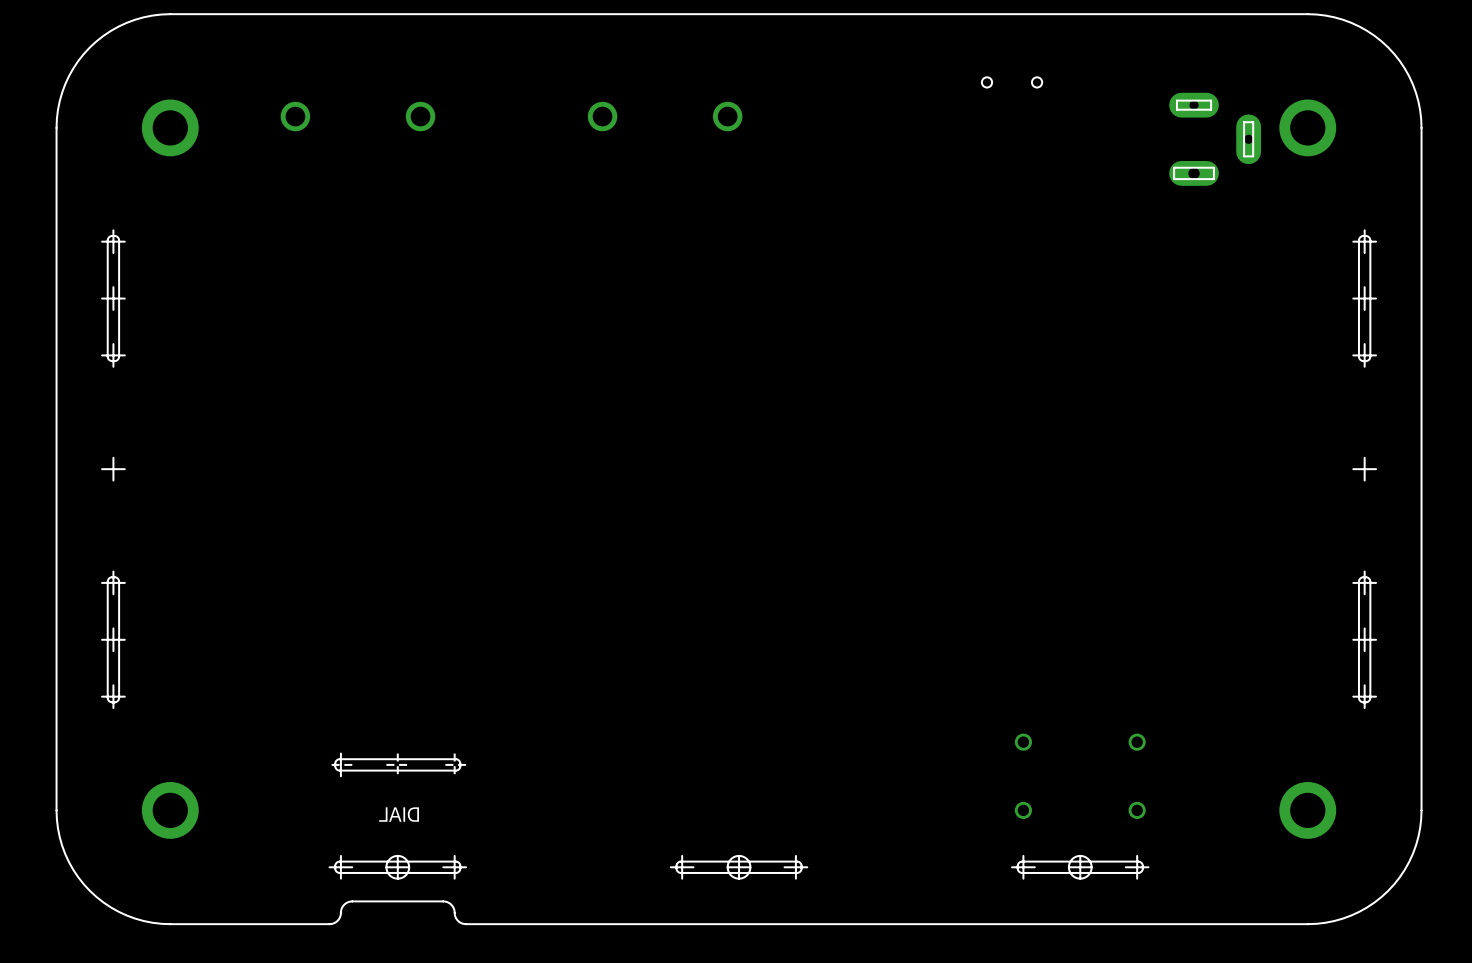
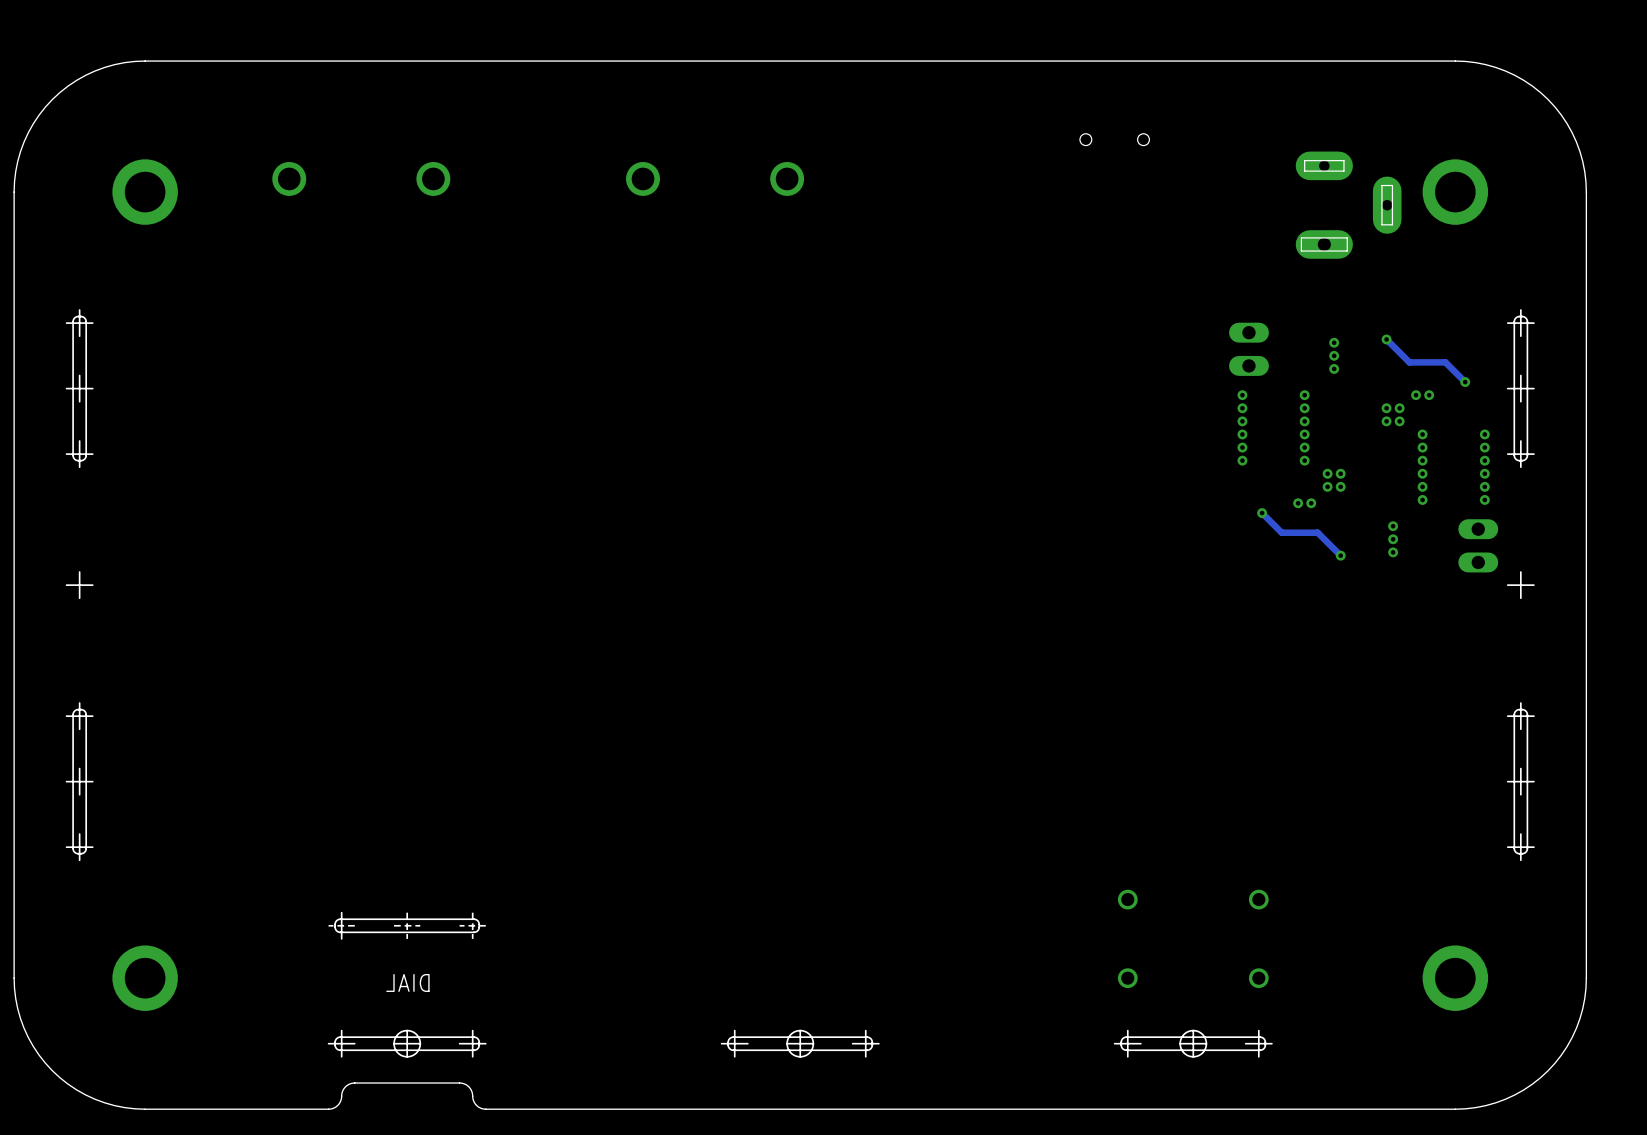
track: none -> (1386, 339) (1409, 362) (1445, 362) (1465, 382)
via: none -> (1386, 339)
via: none -> (1334, 342)
part: none -> (1248, 349)
via: none -> (1334, 355)
via: none -> (1334, 368)
via: none -> (1465, 382)
via: none -> (1242, 395)
via: none -> (1304, 395)
via: none -> (1416, 395)
via: none -> (1429, 395)
via: none -> (1242, 408)
via: none -> (1304, 408)
via: none -> (1386, 408)
via: none -> (1399, 408)
via: none -> (1242, 421)
via: none -> (1304, 421)
via: none -> (1386, 421)
via: none -> (1399, 421)
via: none -> (1242, 434)
via: none -> (1304, 434)
via: none -> (1422, 434)
via: none -> (1484, 434)
via: none -> (1242, 447)
via: none -> (1304, 447)
via: none -> (1422, 447)
via: none -> (1484, 447)
via: none -> (1242, 460)
via: none -> (1304, 460)
via: none -> (1422, 460)
via: none -> (1484, 460)
via: none -> (1327, 473)
via: none -> (1340, 473)
via: none -> (1422, 473)
via: none -> (1484, 473)
via: none -> (1327, 486)
via: none -> (1340, 486)
via: none -> (1422, 486)
via: none -> (1484, 486)
via: none -> (1422, 499)
via: none -> (1484, 499)
via: none -> (1298, 503)
via: none -> (1311, 503)
track: none -> (1262, 513) (1281, 532) (1317, 532) (1340, 555)
via: none -> (1262, 513)
via: none -> (1393, 526)
via: none -> (1393, 539)
part: none -> (1478, 545)
via: none -> (1393, 552)
via: none -> (1340, 555)

